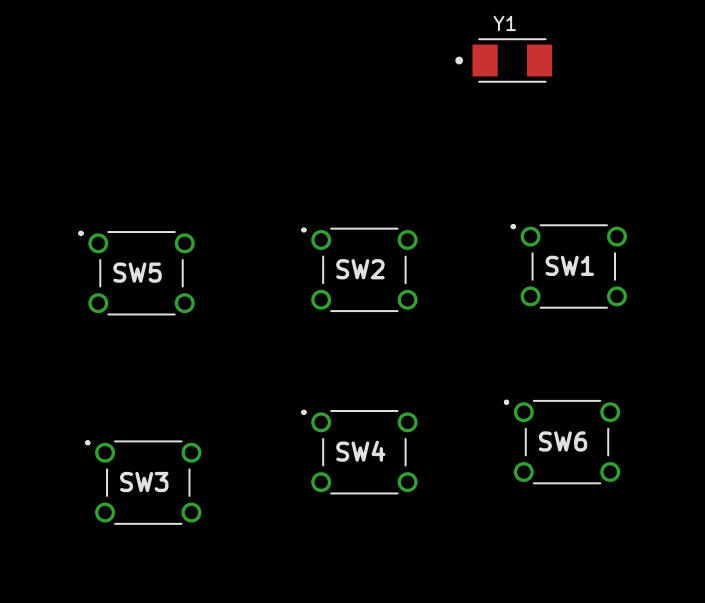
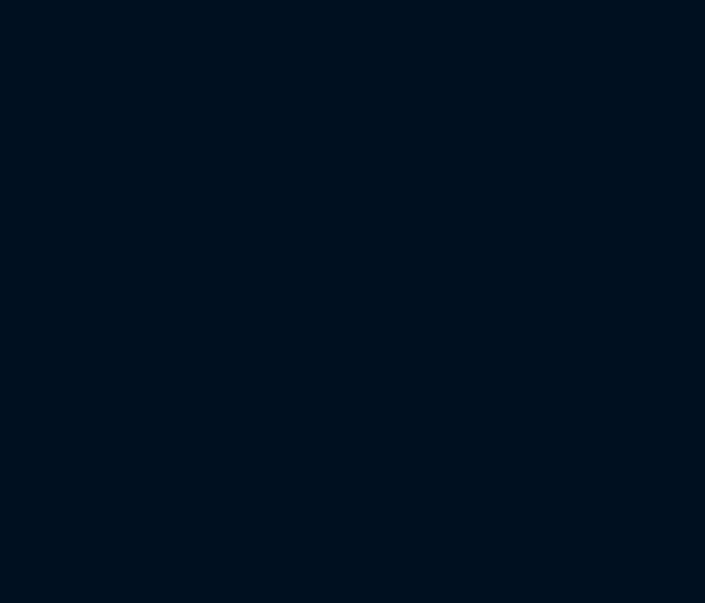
Y1: (503, 60) -> none
SW1: (568, 266) -> none
SW2: (359, 269) -> none
SW5: (136, 272) -> none
SW6: (562, 441) -> none
SW4: (359, 451) -> none
SW3: (143, 482) -> none

